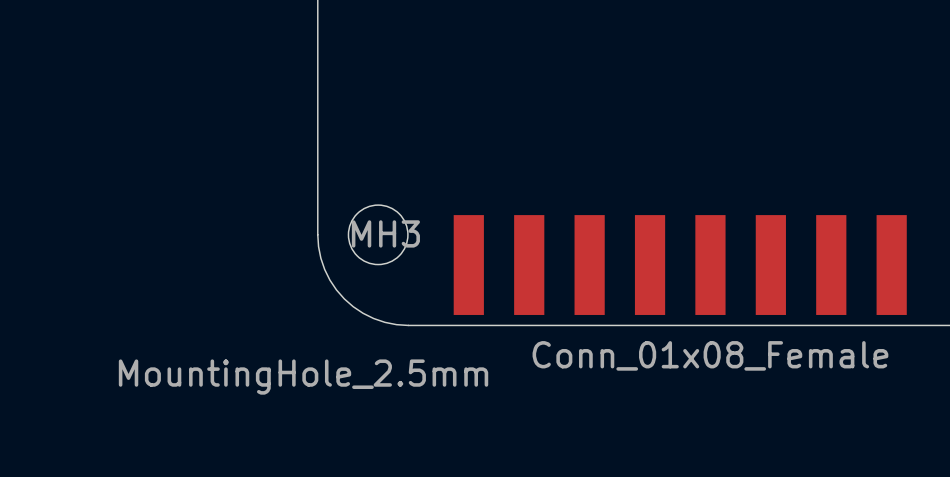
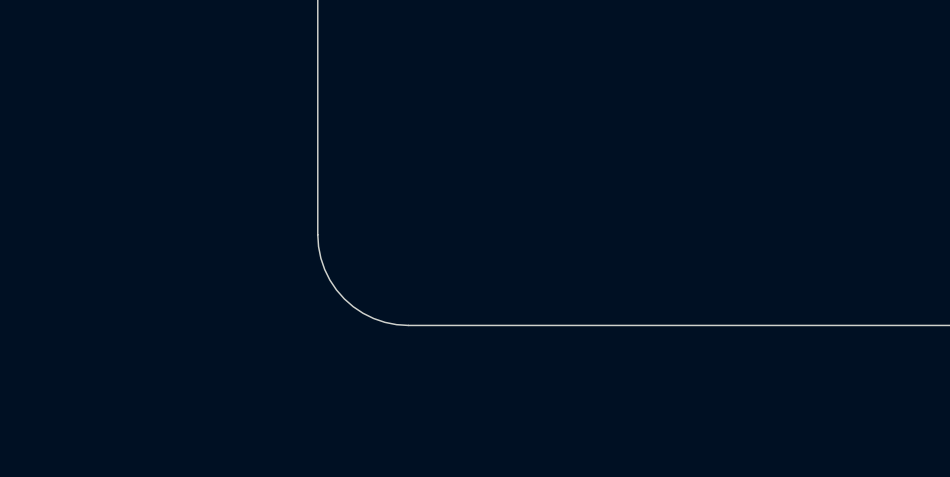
MH3: MountingHole_2.5mm (378, 234) -> none
part: Conn_01x08_Female (680, 265) -> none

